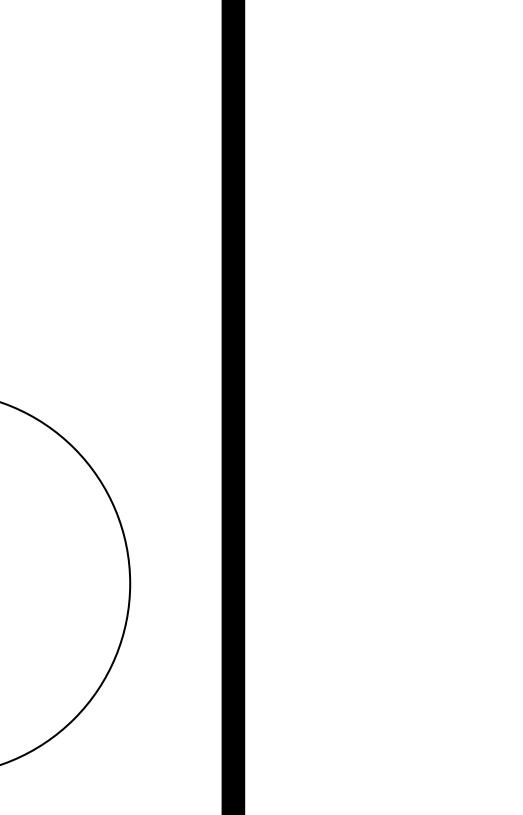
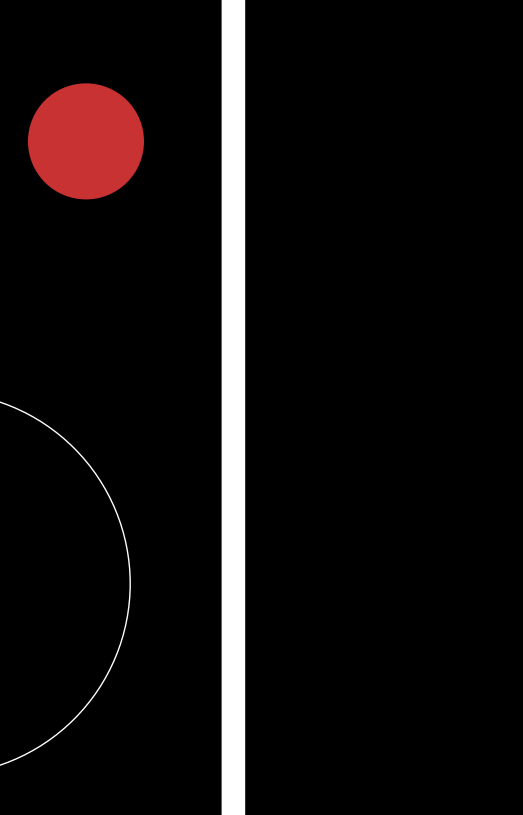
part: none -> (85, 141)

